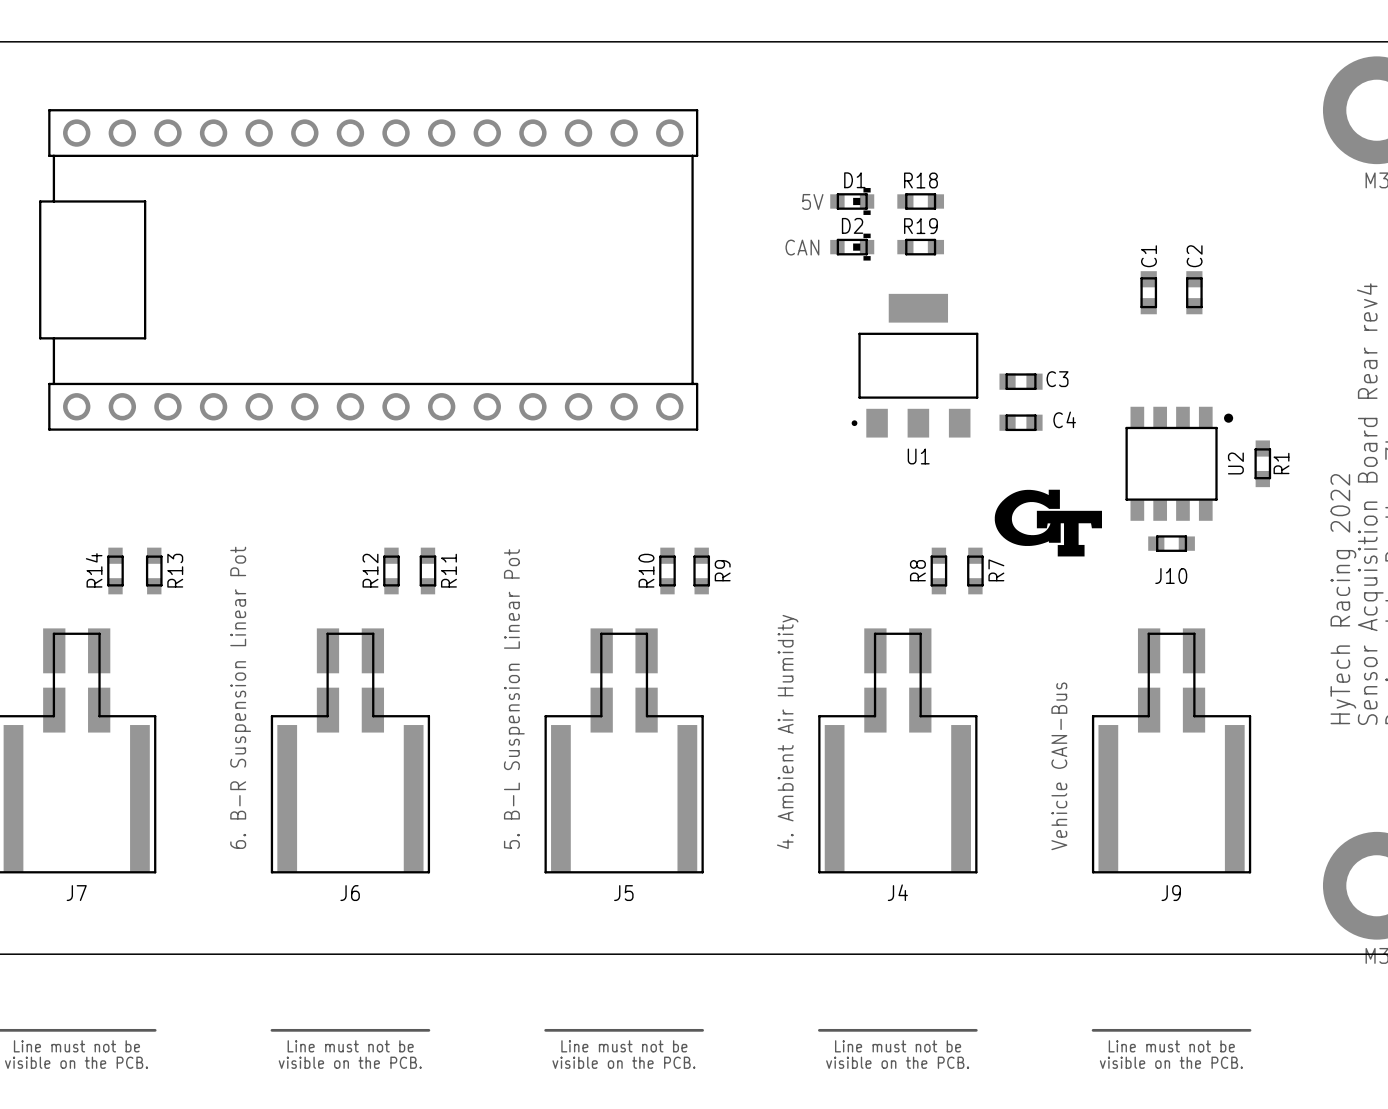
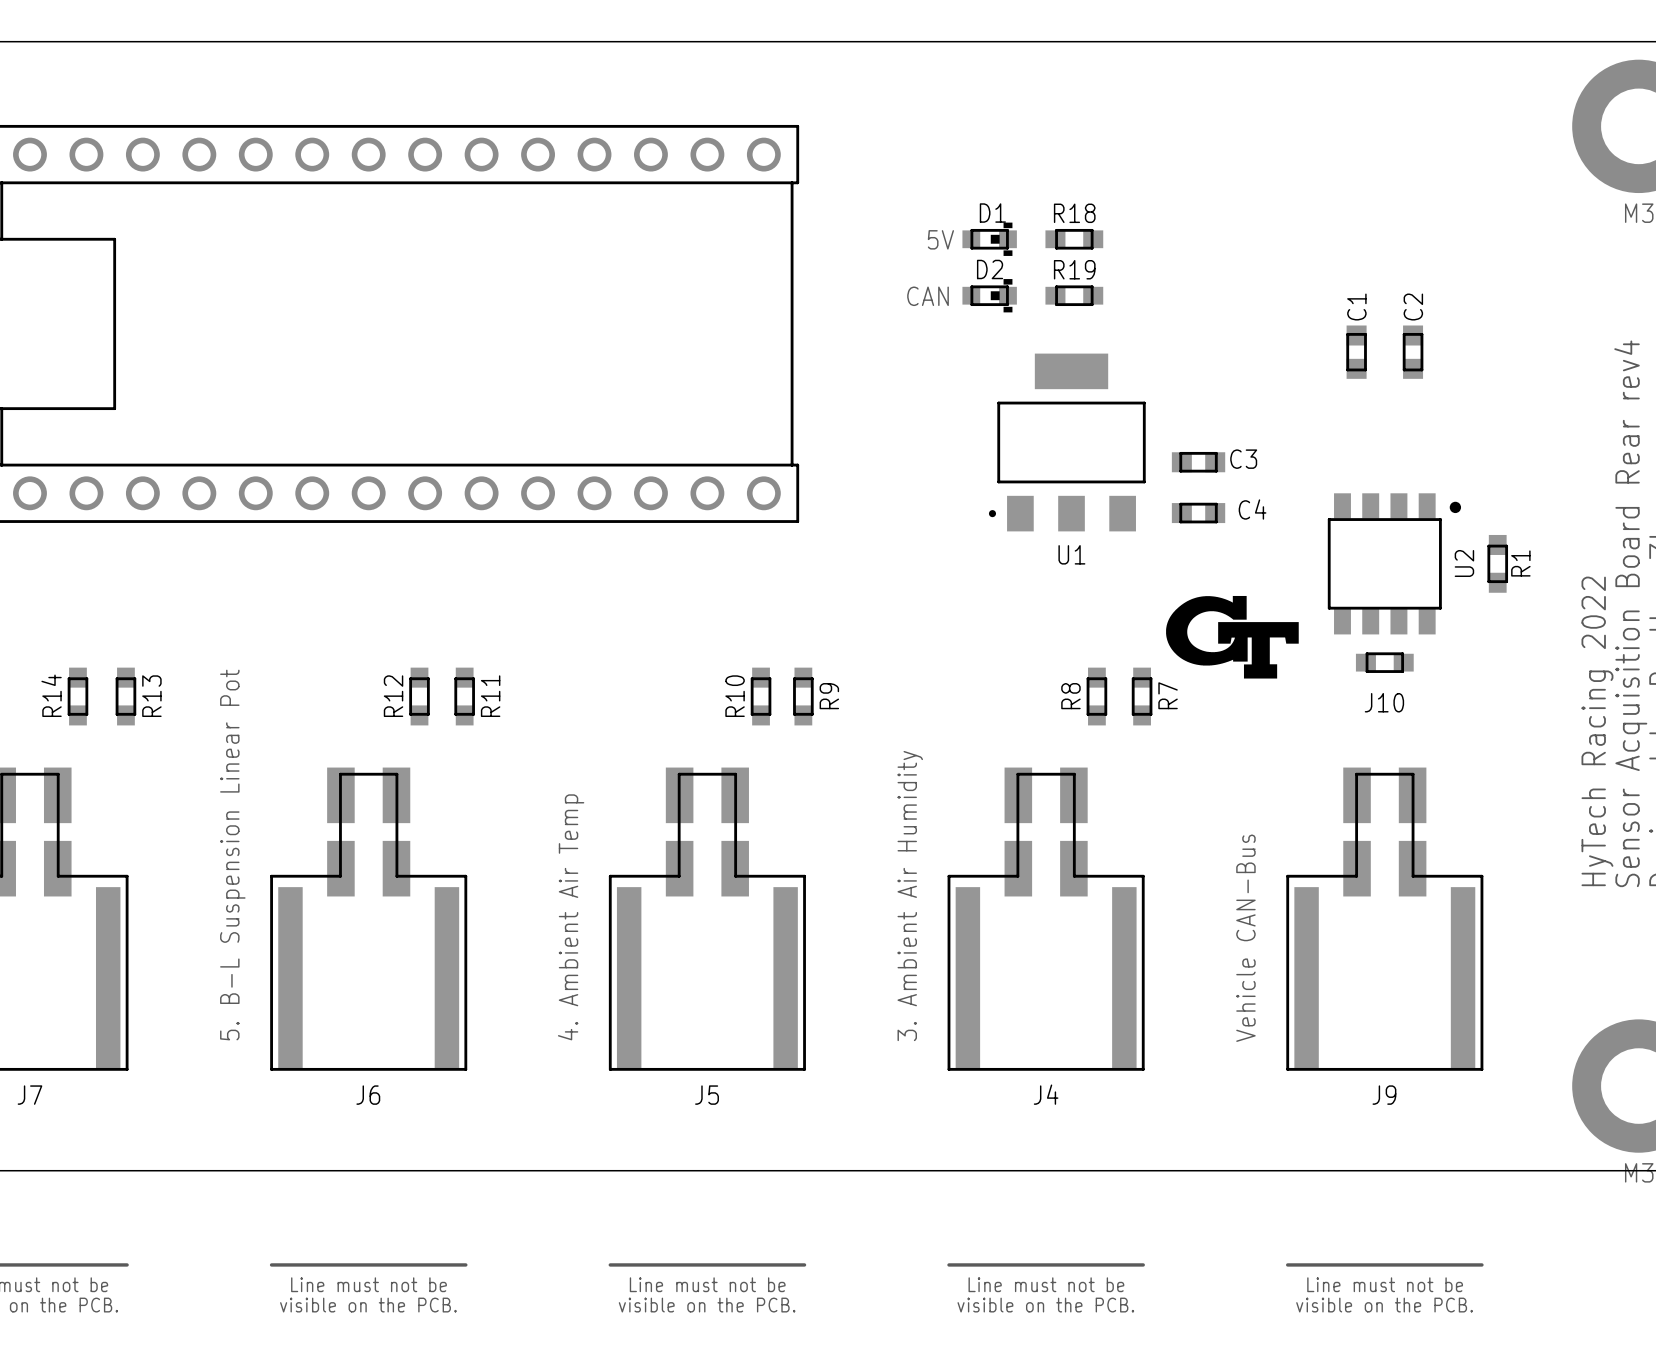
text: 6. B-R Suspension Linear Pot (240, 697) -> 5. B-L Suspension Linear Pot (232, 855)
text: 5. B-L Suspension Linear Pot (514, 699) -> 4. Ambient Air Temp (571, 917)
text: 4. Ambient Air Humidity (787, 731) -> 3. Ambient Air Humidity (910, 896)

